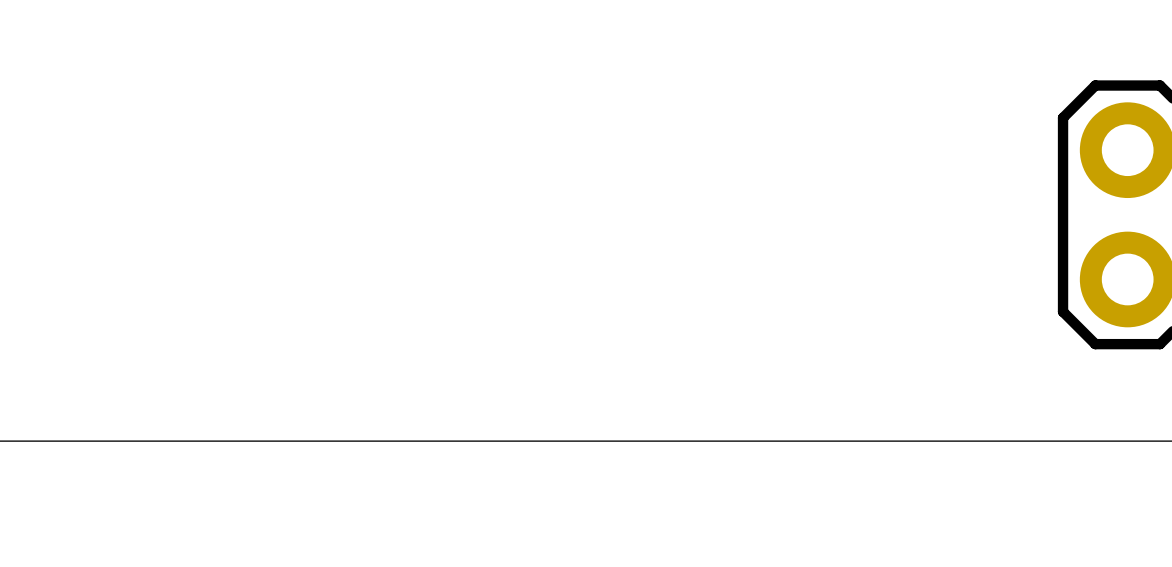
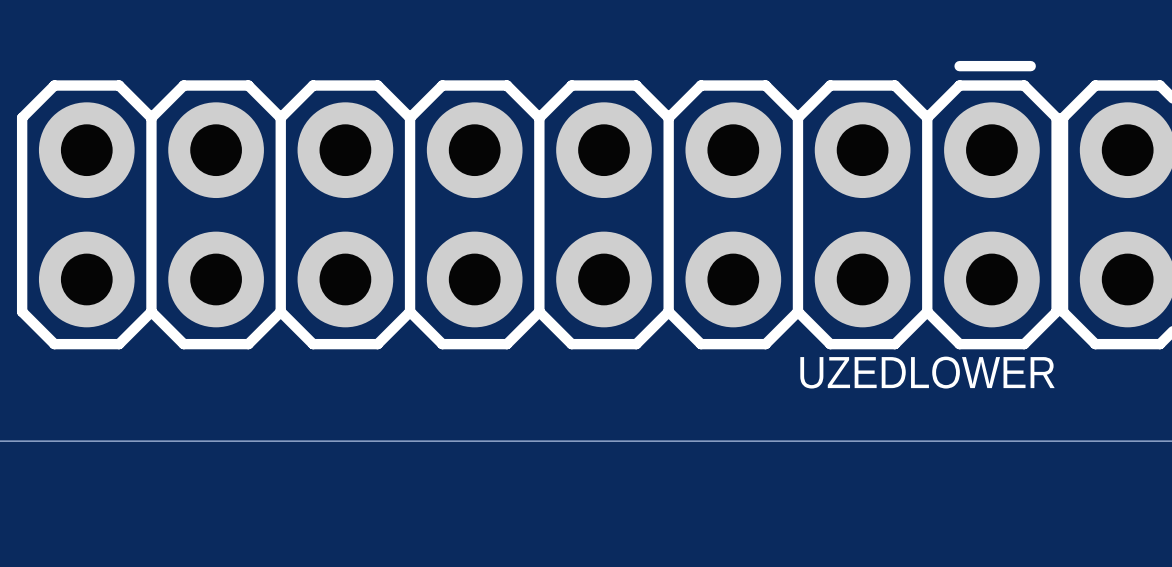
UZEDLOWER: none -> (539, 205)

